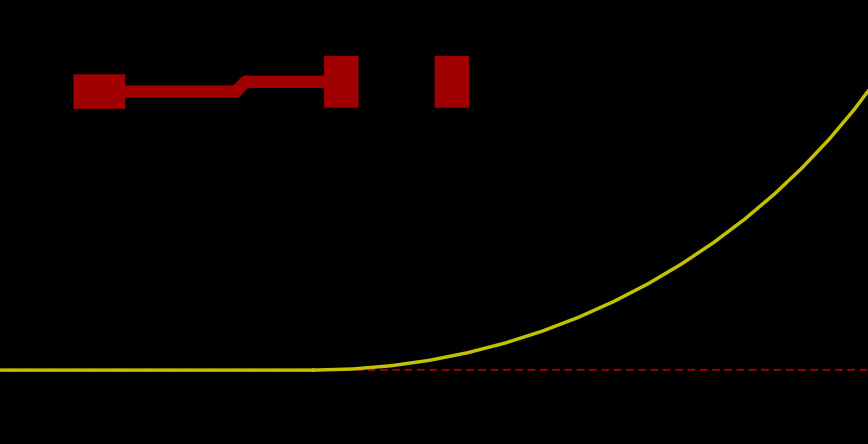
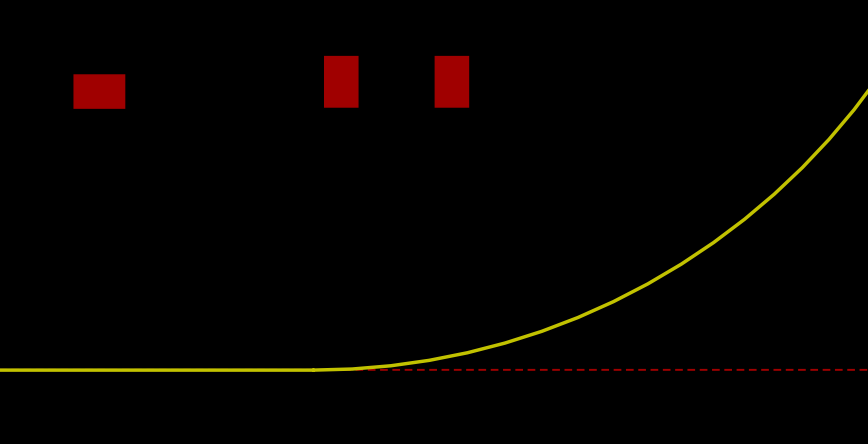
top track: (341, 81) (245, 81) (235, 91) (99, 91) -> none

